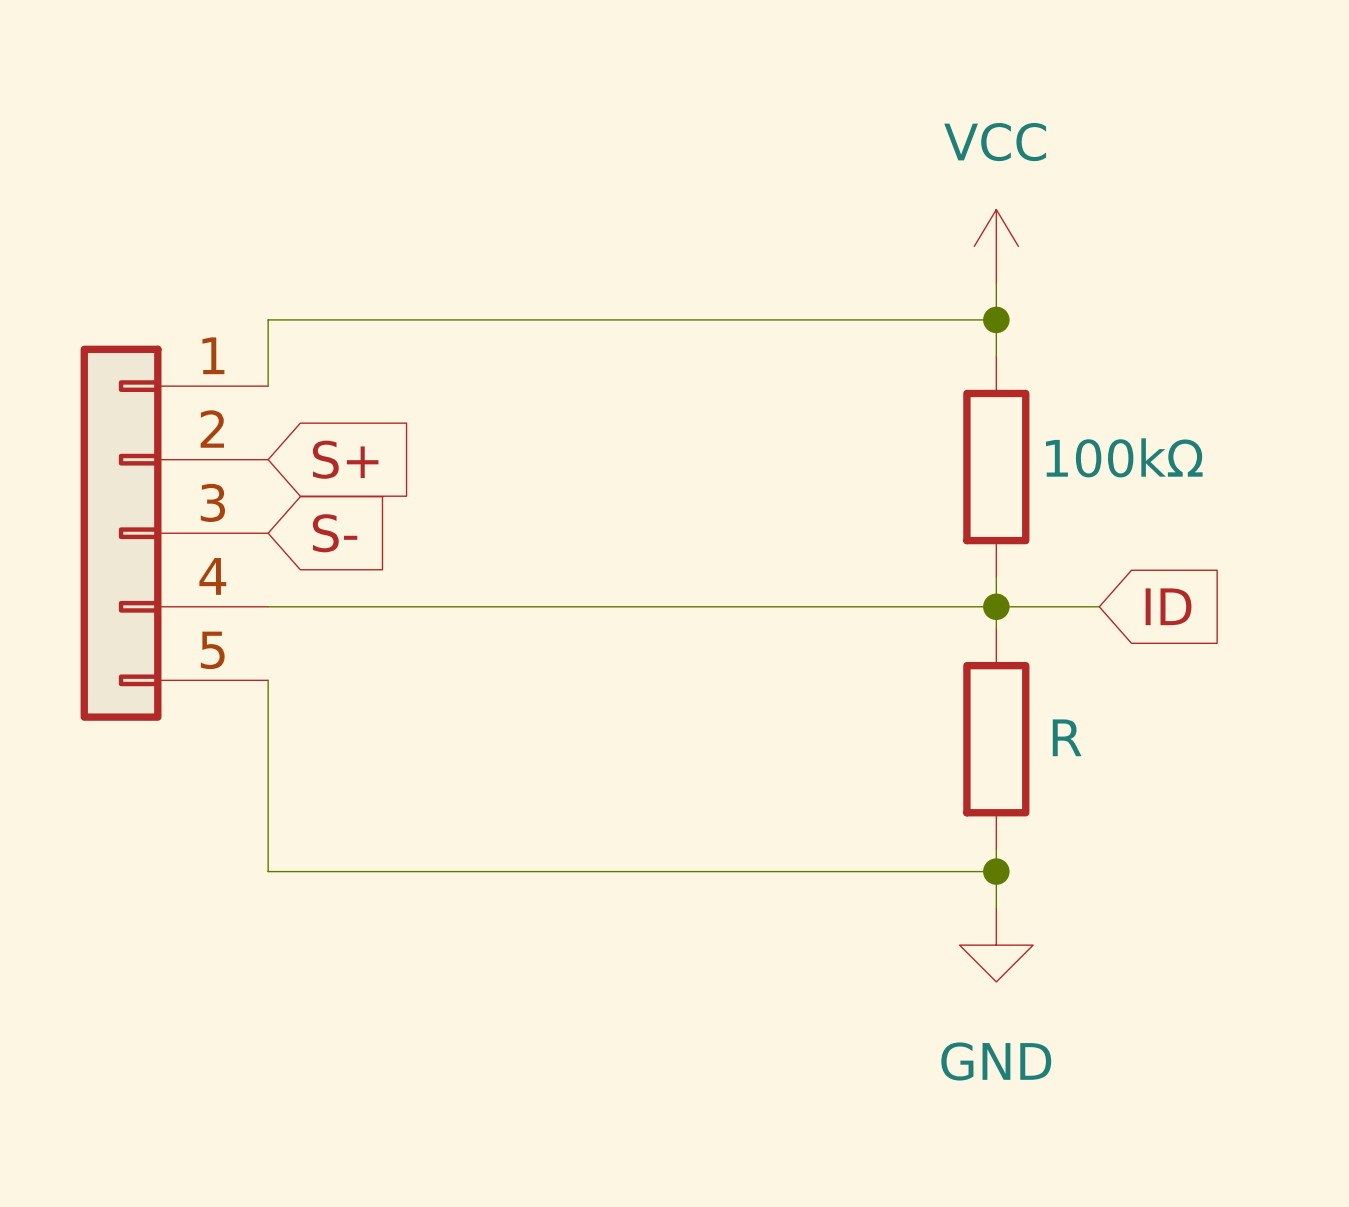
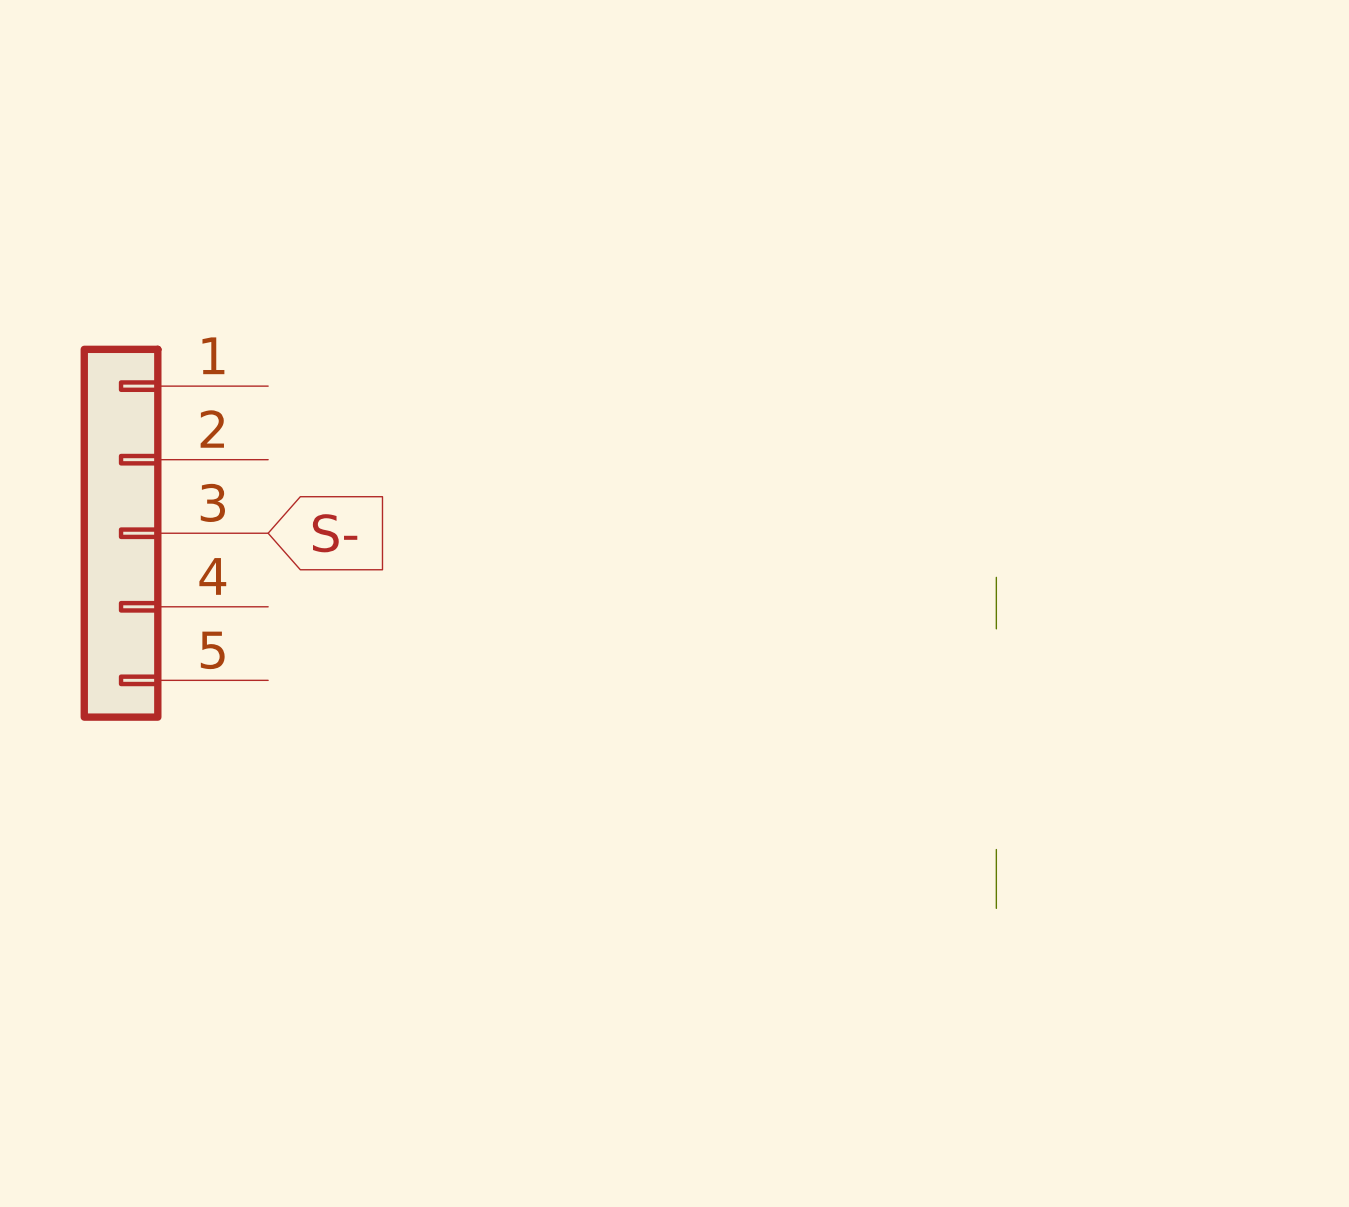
power symbol: VCC (996, 246) -> none
wire: (996, 283) (996, 356) -> none
wire: (996, 319) (268, 319) (268, 386) -> none
junction: (996, 319) -> none
global label: S+ (345, 459) -> none
part: 100kΩ (996, 467) -> none
wire: (268, 606) (1099, 606) -> none
junction: (996, 606) -> none
global label: ID (1168, 606) -> none
wire: (268, 680) (268, 871) (996, 871) -> none
part: R (996, 739) -> none
junction: (996, 871) -> none
power symbol: GND (996, 945) -> none

